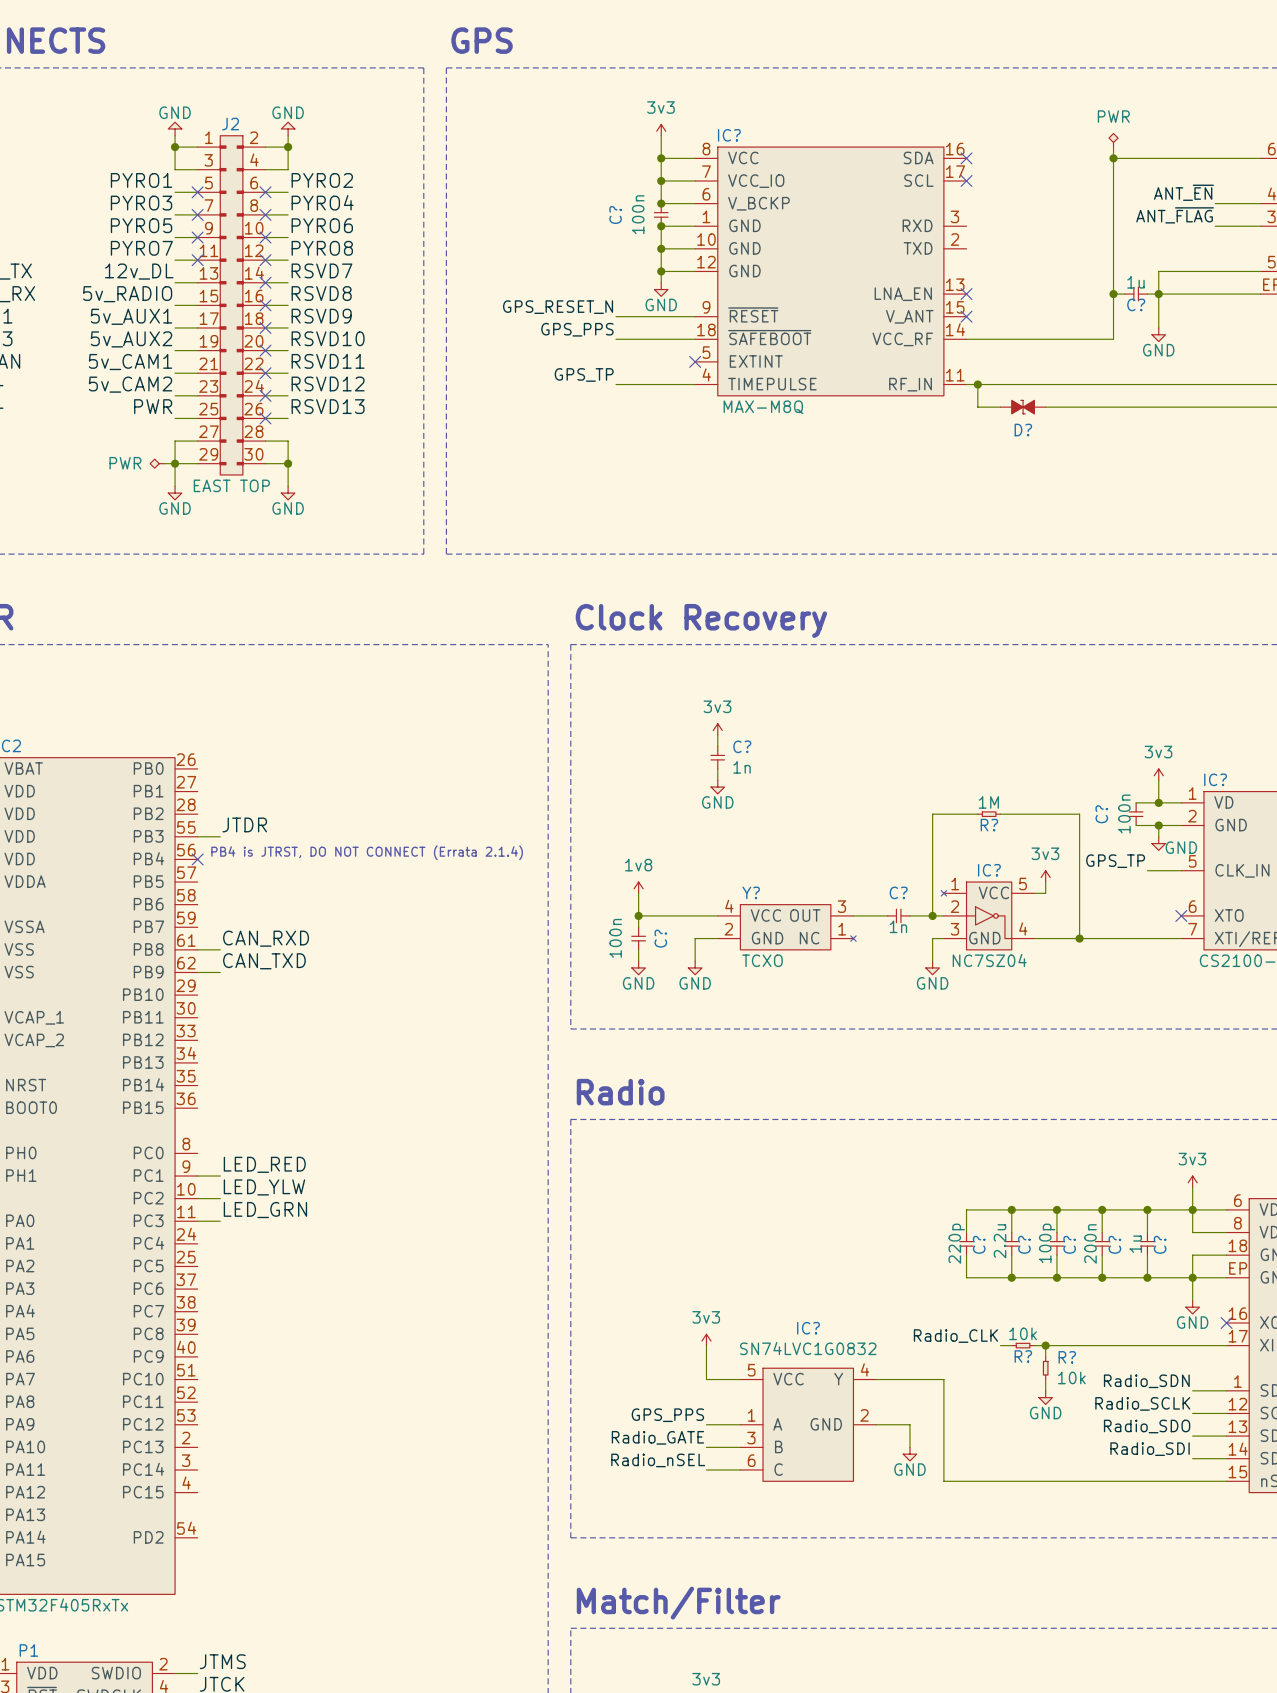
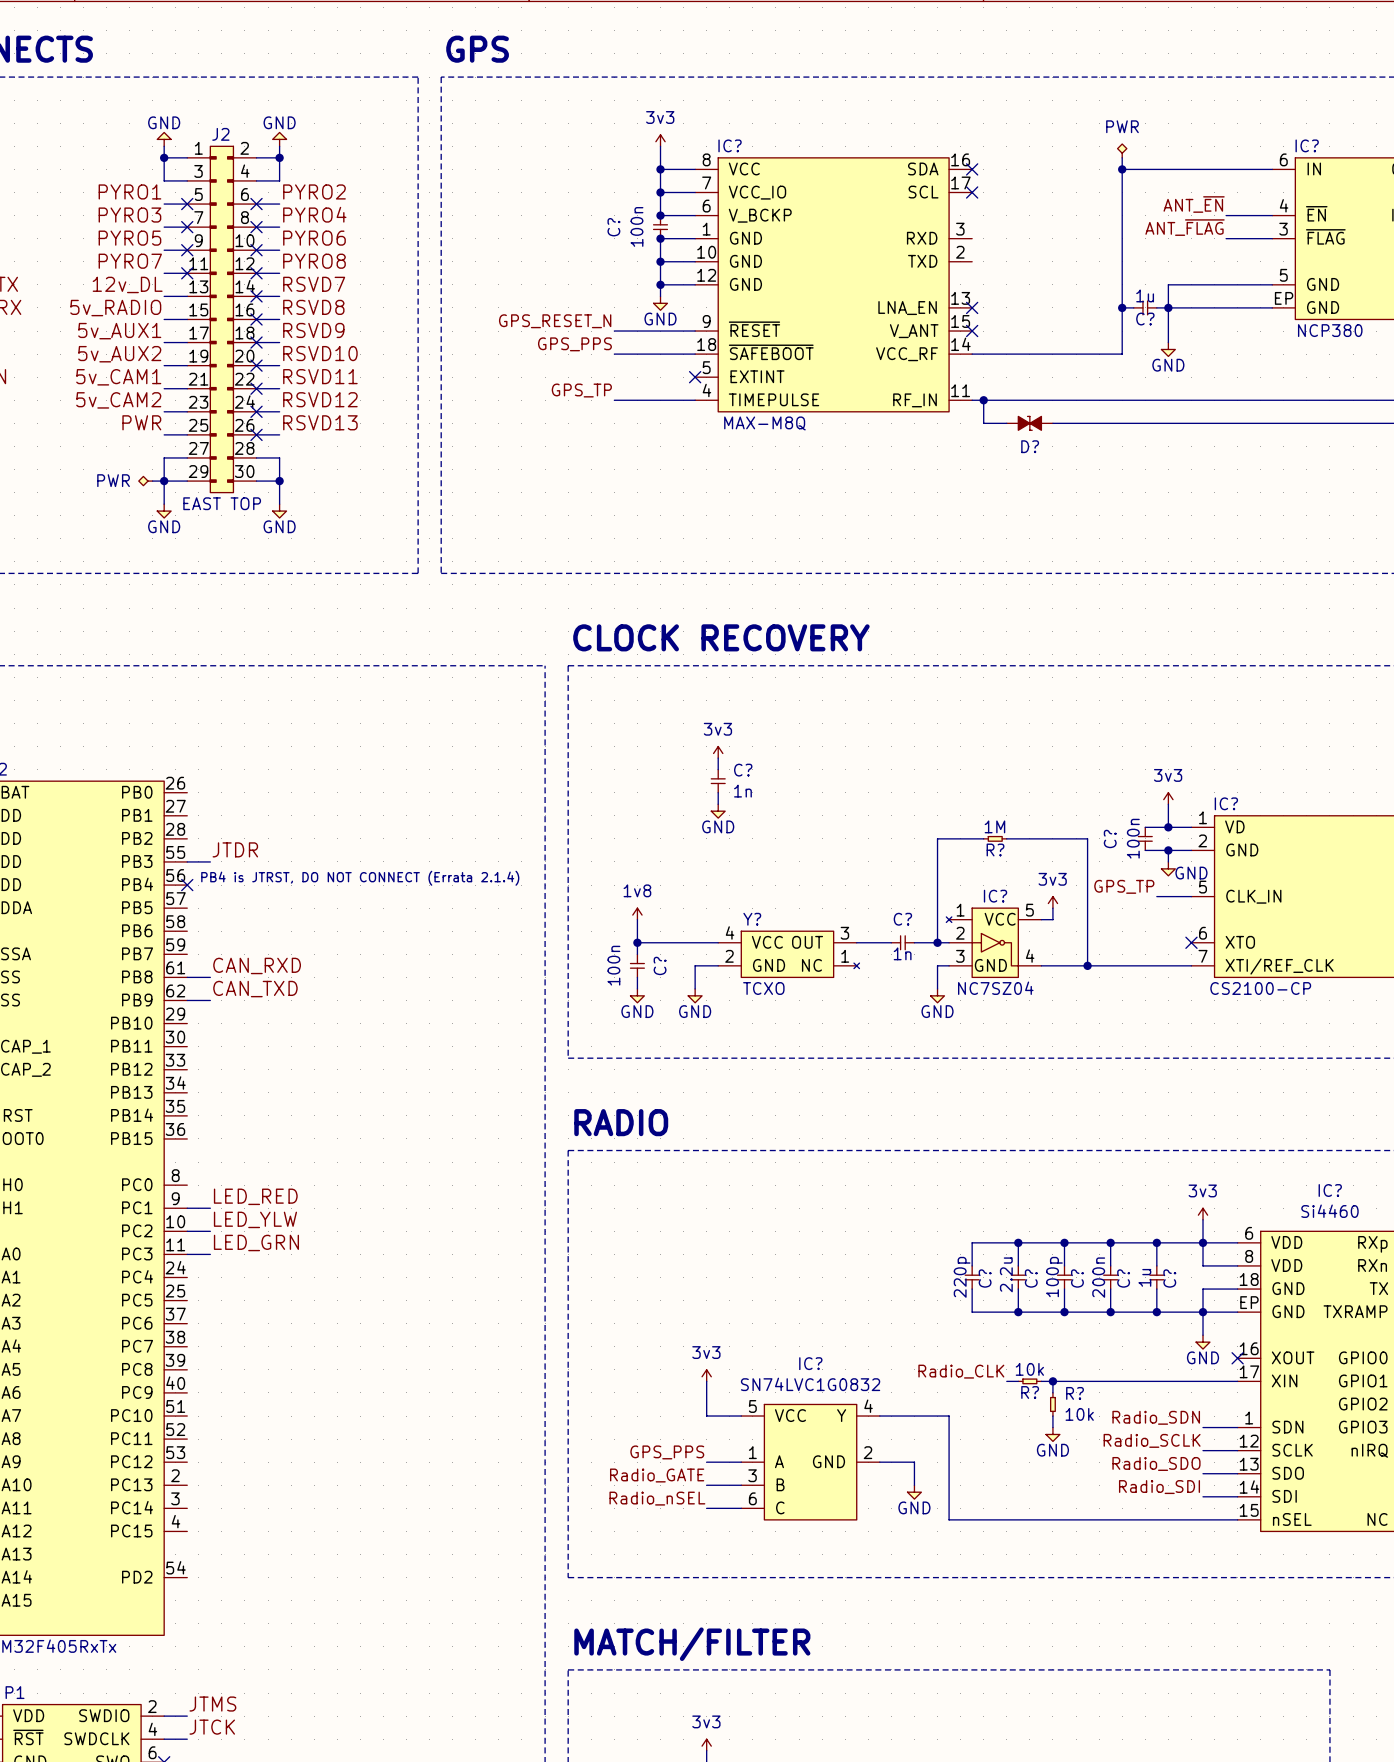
text: Clock Recovery (701, 620) -> CLOCK RECOVERY (721, 637)
text: Radio (620, 1092) -> RADIO (621, 1122)
text: Match/Filter (678, 1603) -> MATCH/FILTER (692, 1644)

